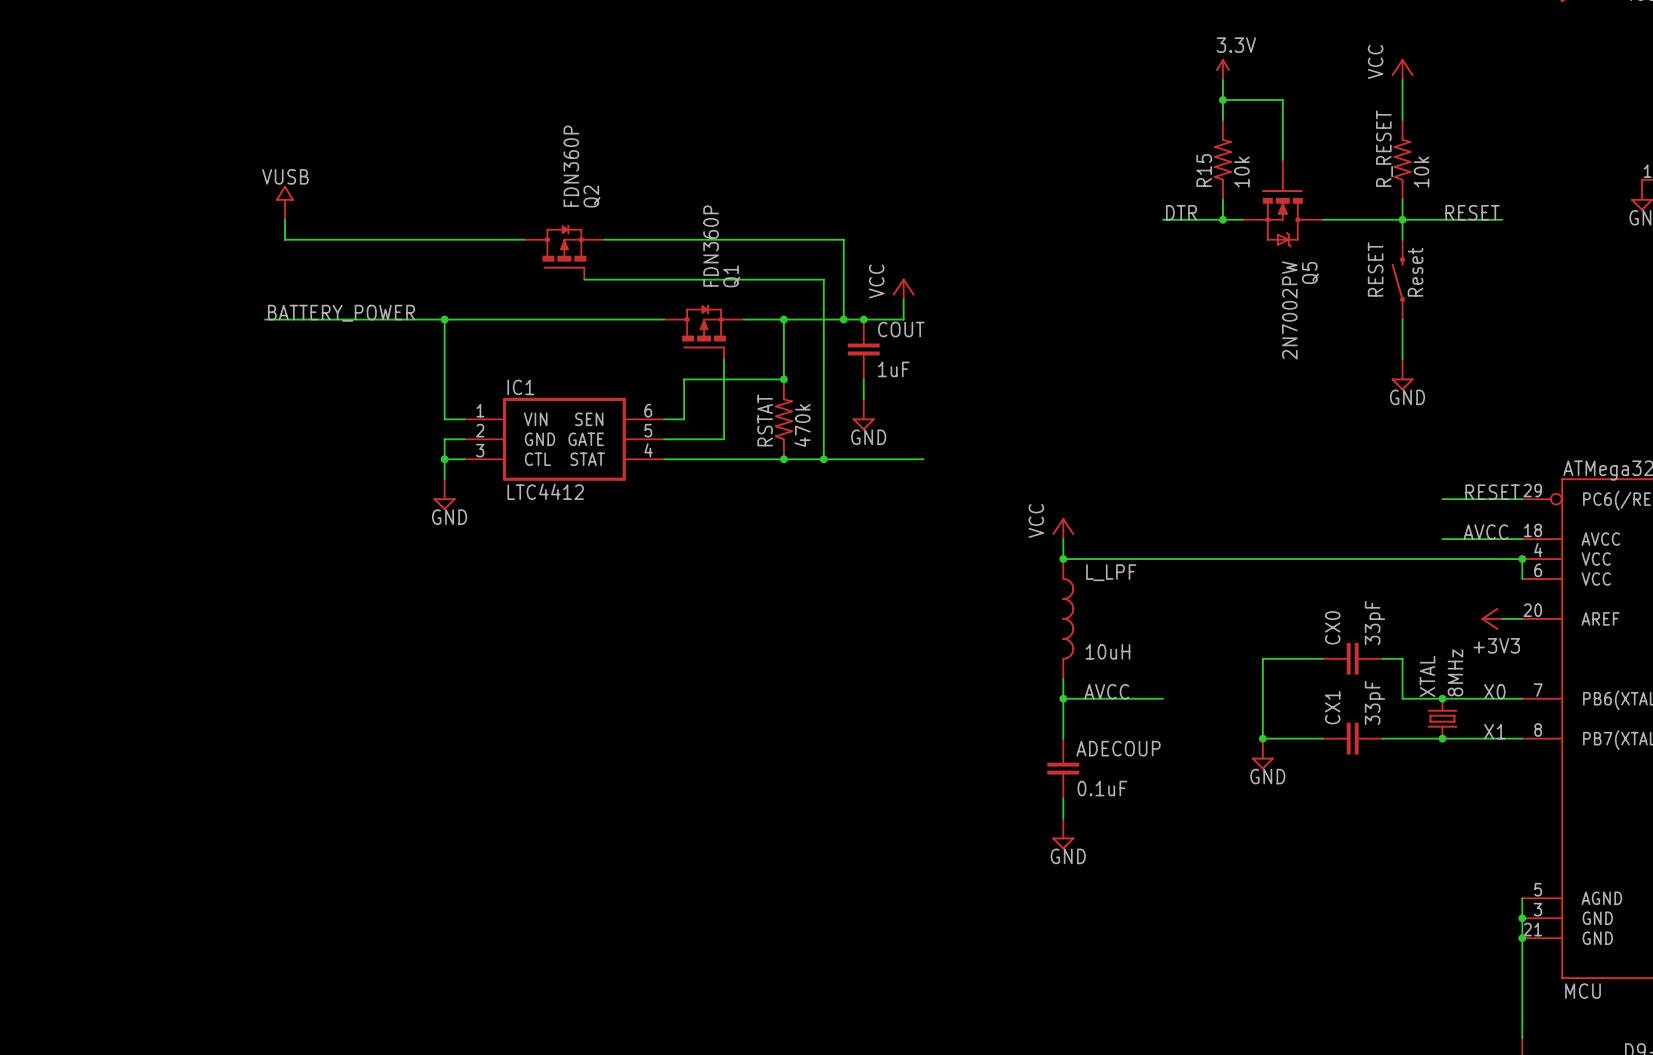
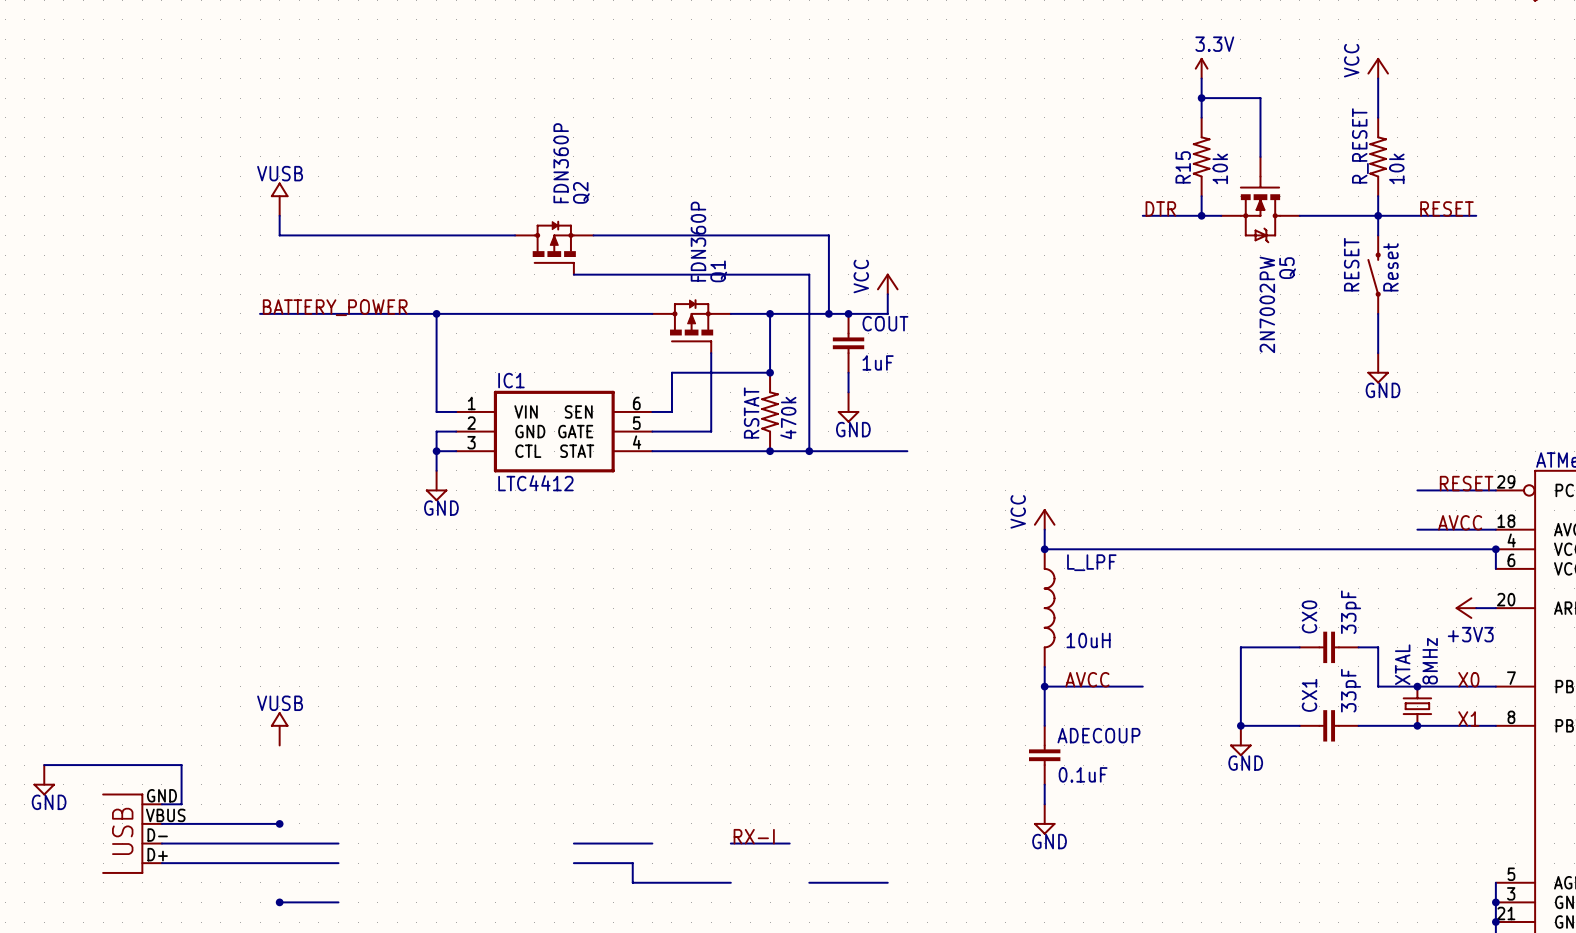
power symbol: none -> VUSB (279, 728)
wire: none -> (44, 765) (181, 765) (181, 804) (161, 804)
power symbol: none -> GND (44, 780)
wire: none -> (161, 823) (279, 823)
junction: none -> (279, 823)
part: none -> (132, 833)
label: none -> RX-I (754, 836)
wire: none -> (161, 843) (338, 843)
wire: none -> (573, 843) (652, 843)
wire: none -> (730, 843) (789, 843)
wire: none -> (161, 863) (338, 863)
wire: none -> (573, 863) (632, 863) (632, 882) (730, 882)
wire: none -> (809, 882) (887, 882)
wire: none -> (279, 902) (338, 902)
junction: none -> (279, 902)

